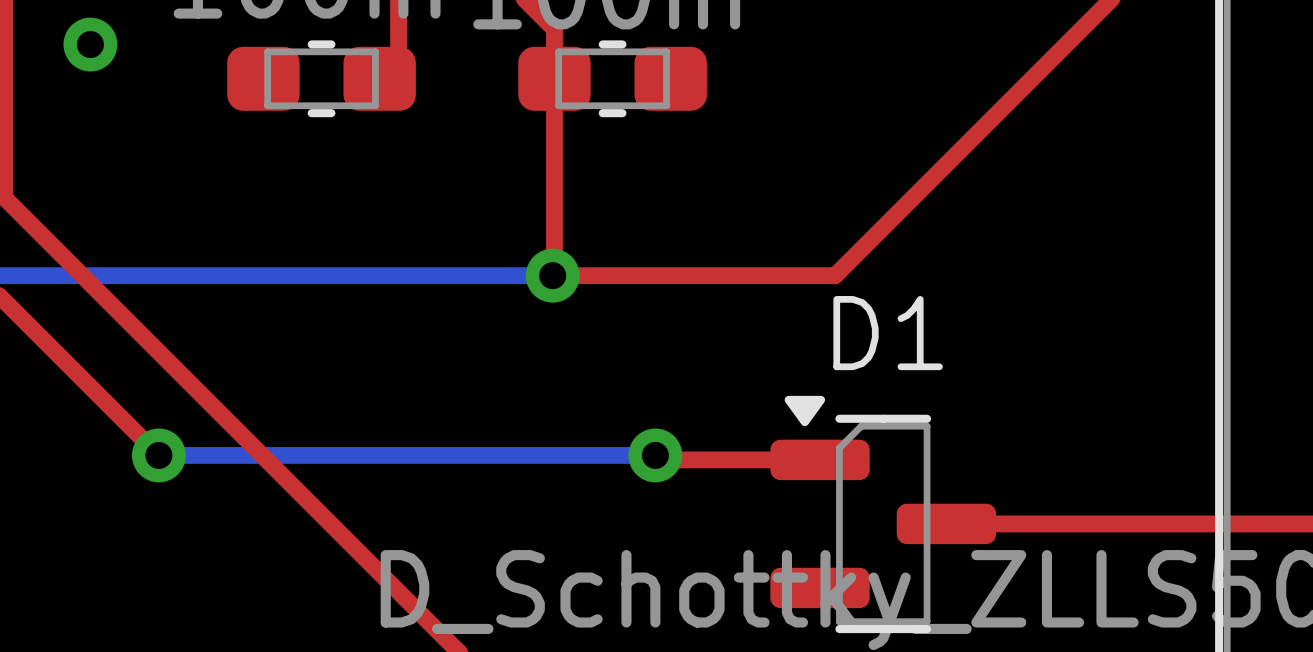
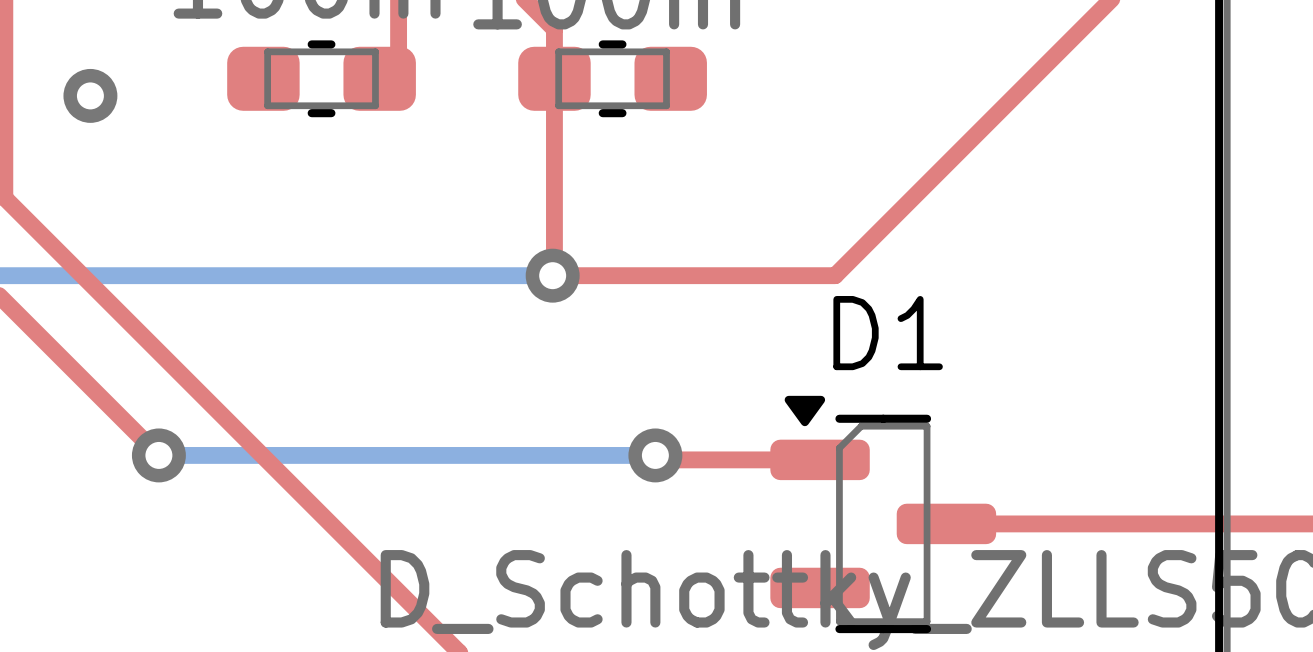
via position: (90, 44) -> (90, 95)

